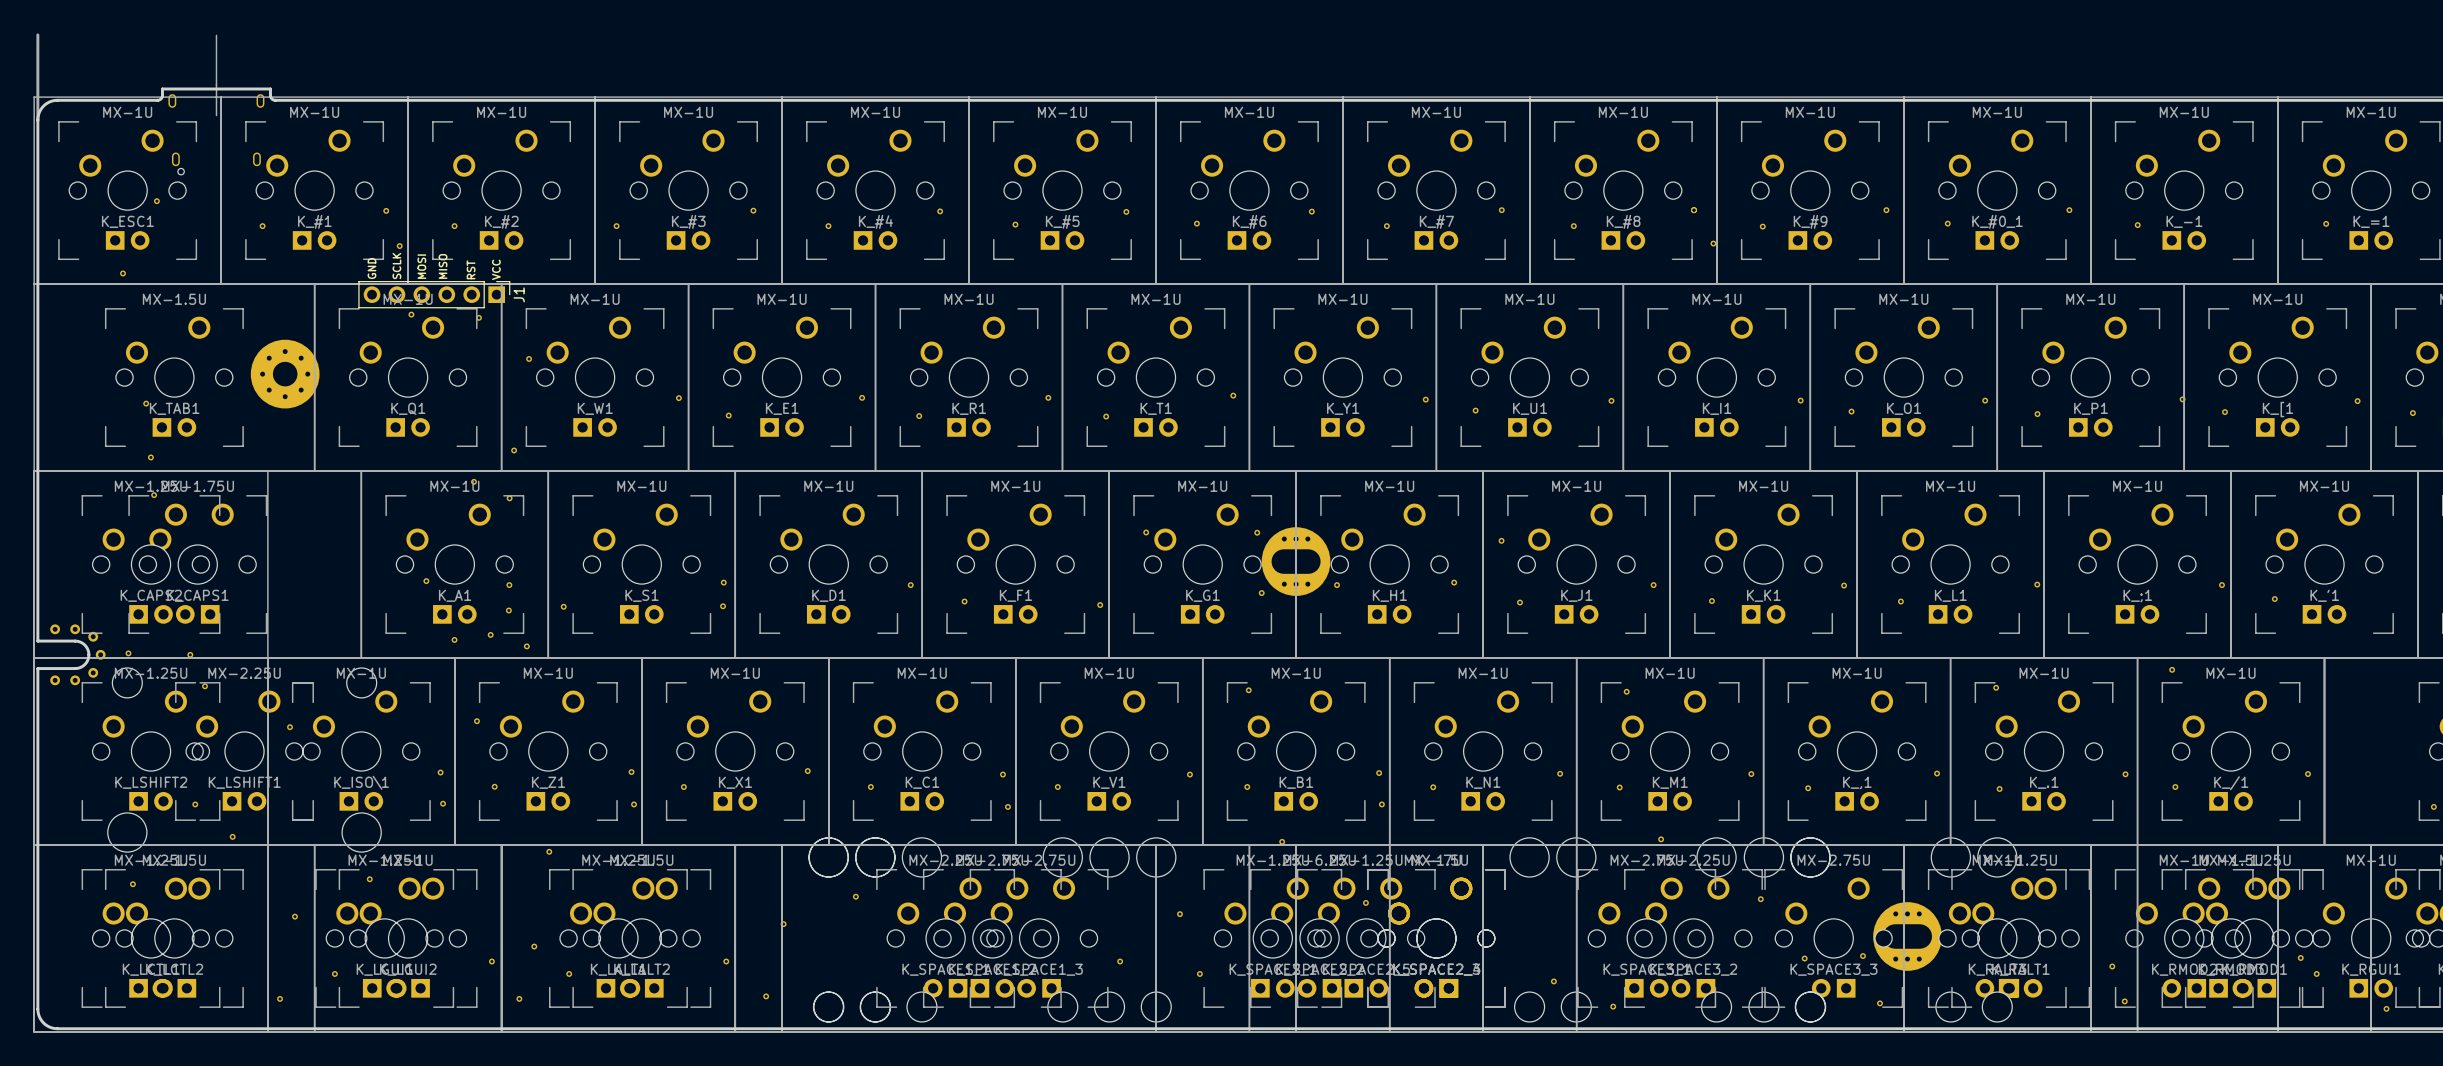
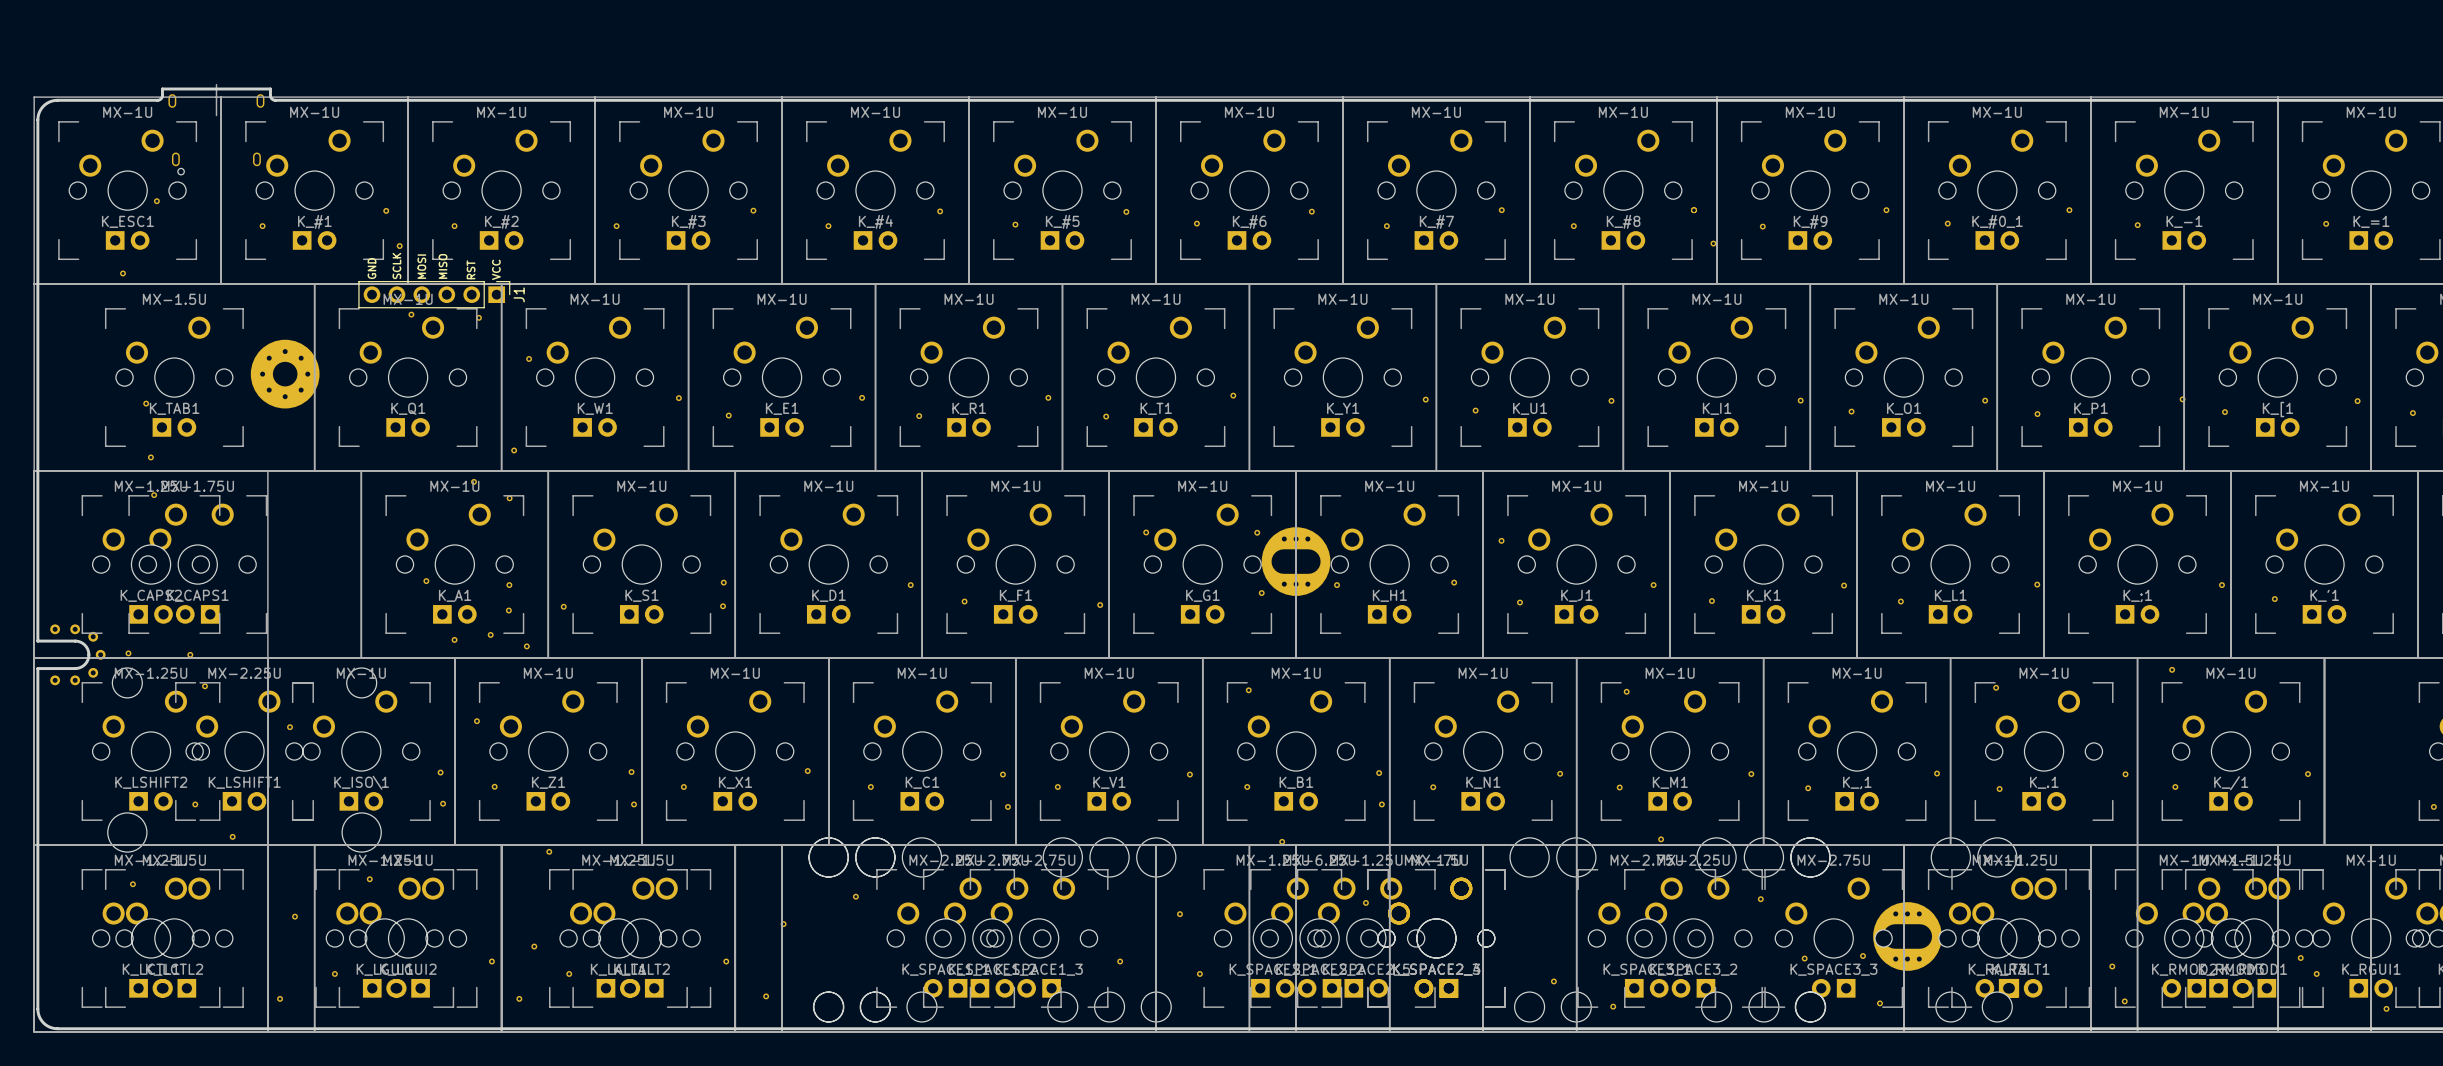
line: (37, 34) (37, 121) -> none
line: (216, 35) (216, 85) -> none

